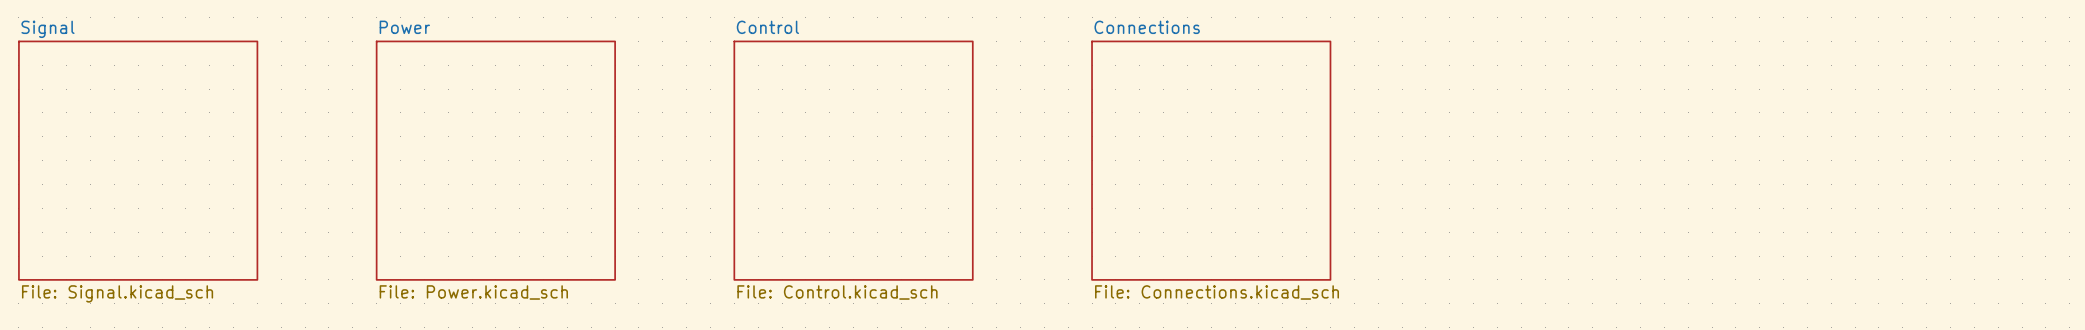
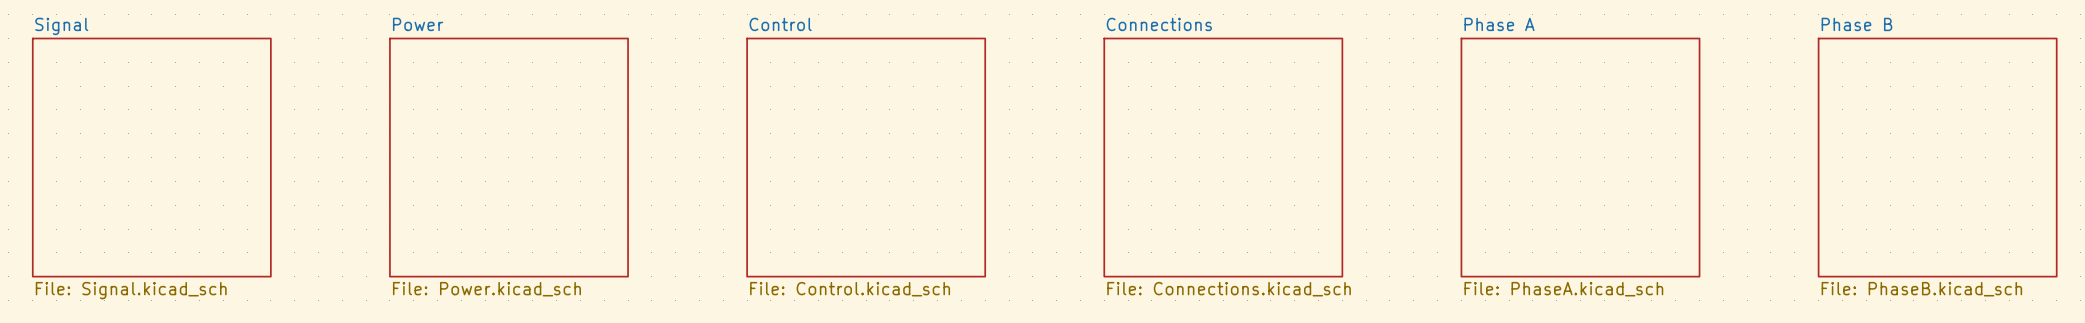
sheet Phase A: none -> File: PhaseA.kicad_sch (1580, 157)
sheet Phase B: none -> File: PhaseB.kicad_sch (1937, 157)

